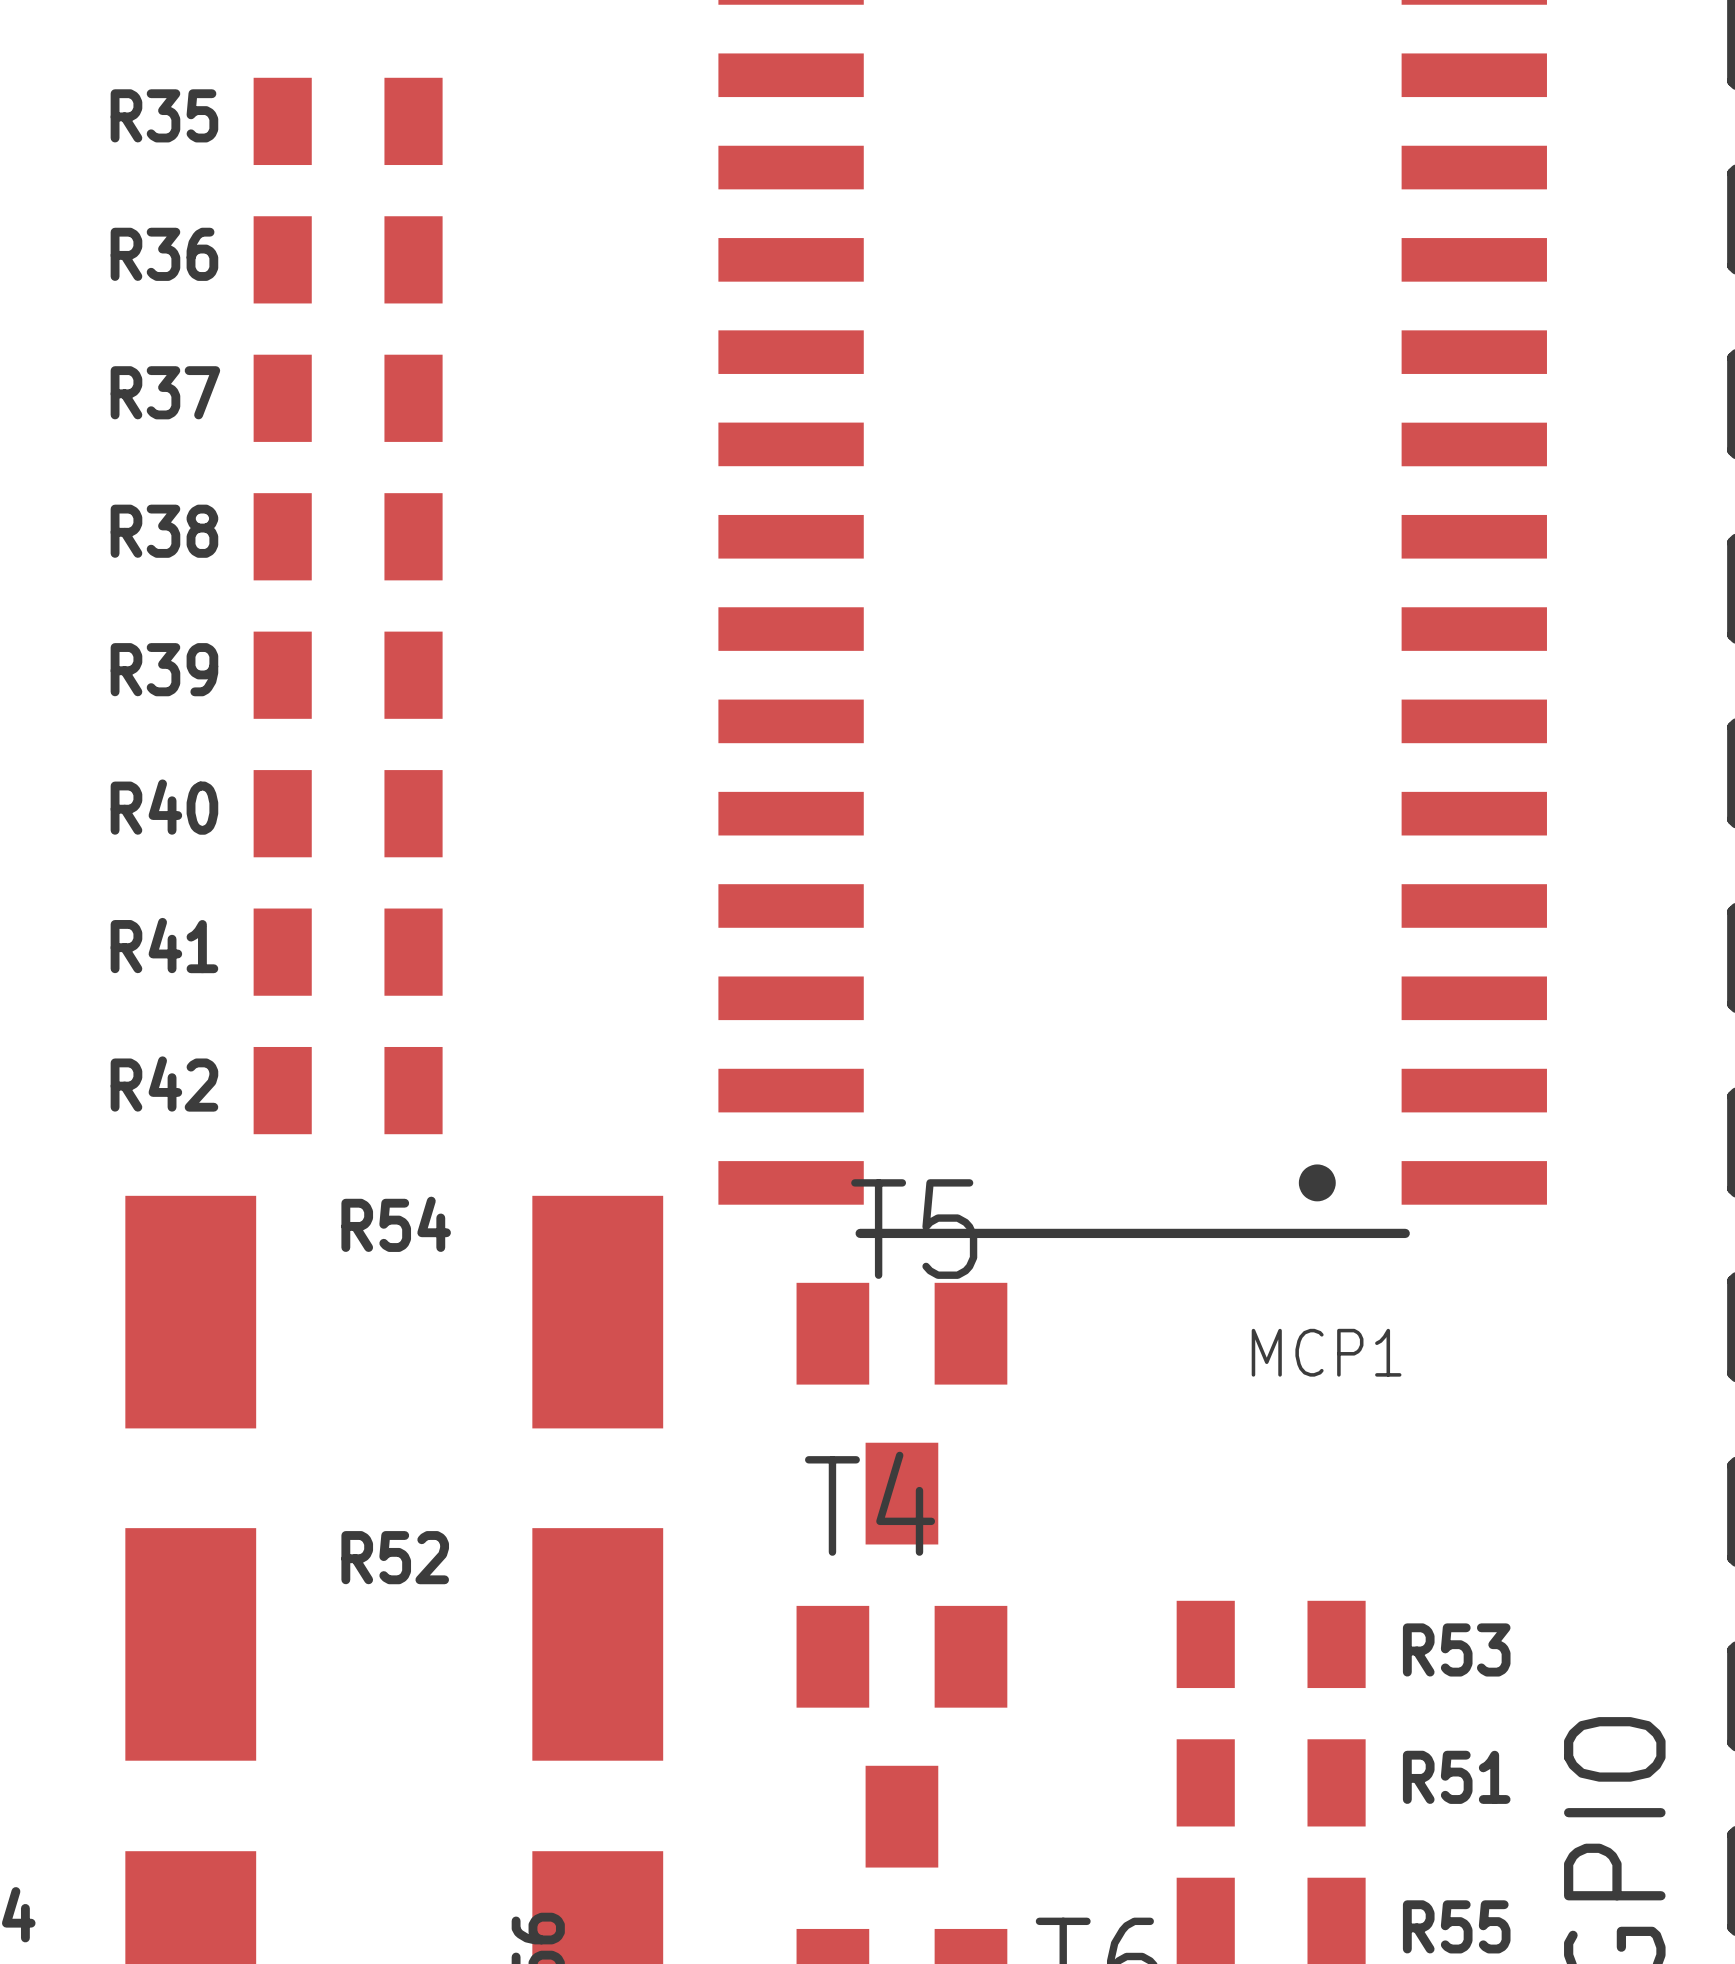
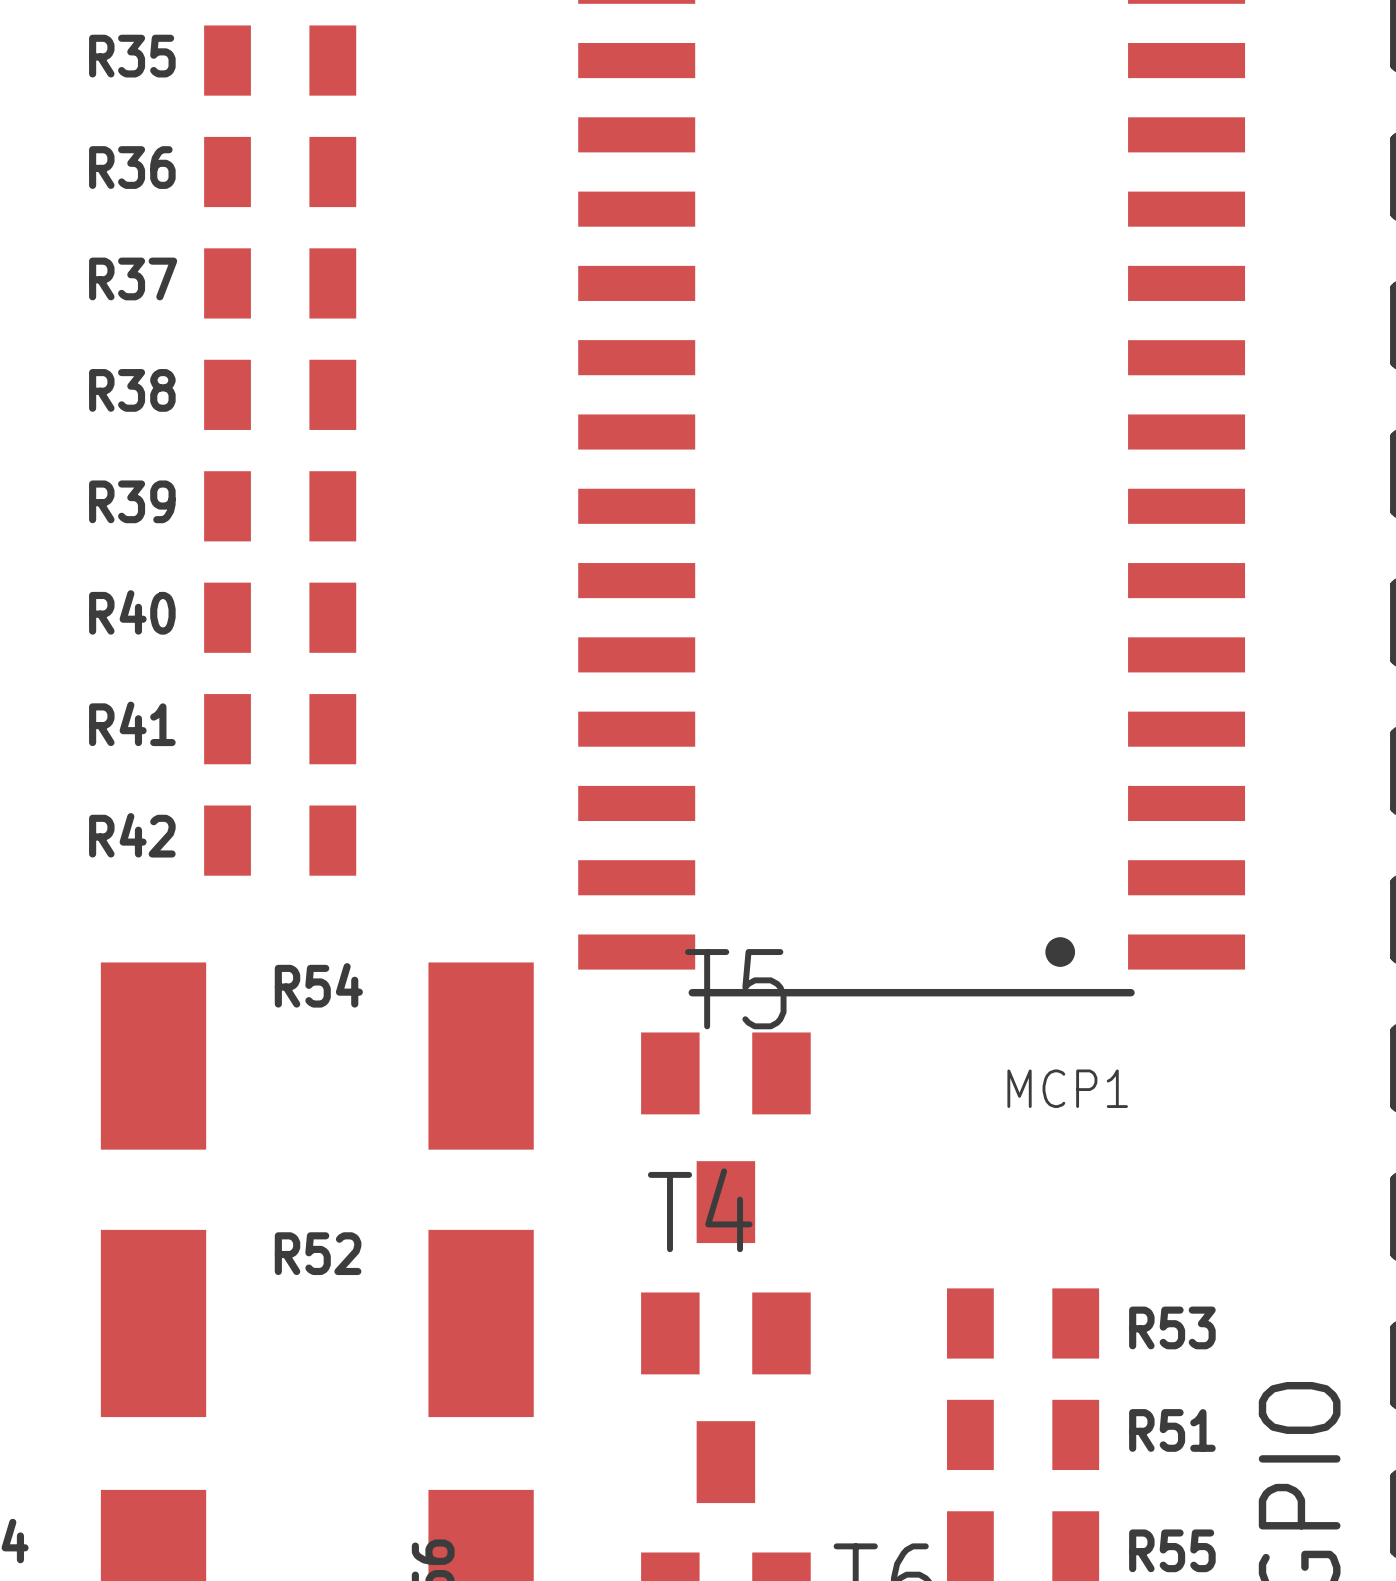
R35 position: (348, 121) -> (280, 60)
R36 position: (348, 259) -> (280, 171)
R37 position: (348, 398) -> (280, 283)
R38 position: (348, 536) -> (280, 394)
R39 position: (348, 675) -> (280, 506)
R40 position: (348, 813) -> (280, 617)
R41 position: (348, 952) -> (280, 729)
R42 position: (348, 1090) -> (280, 840)

